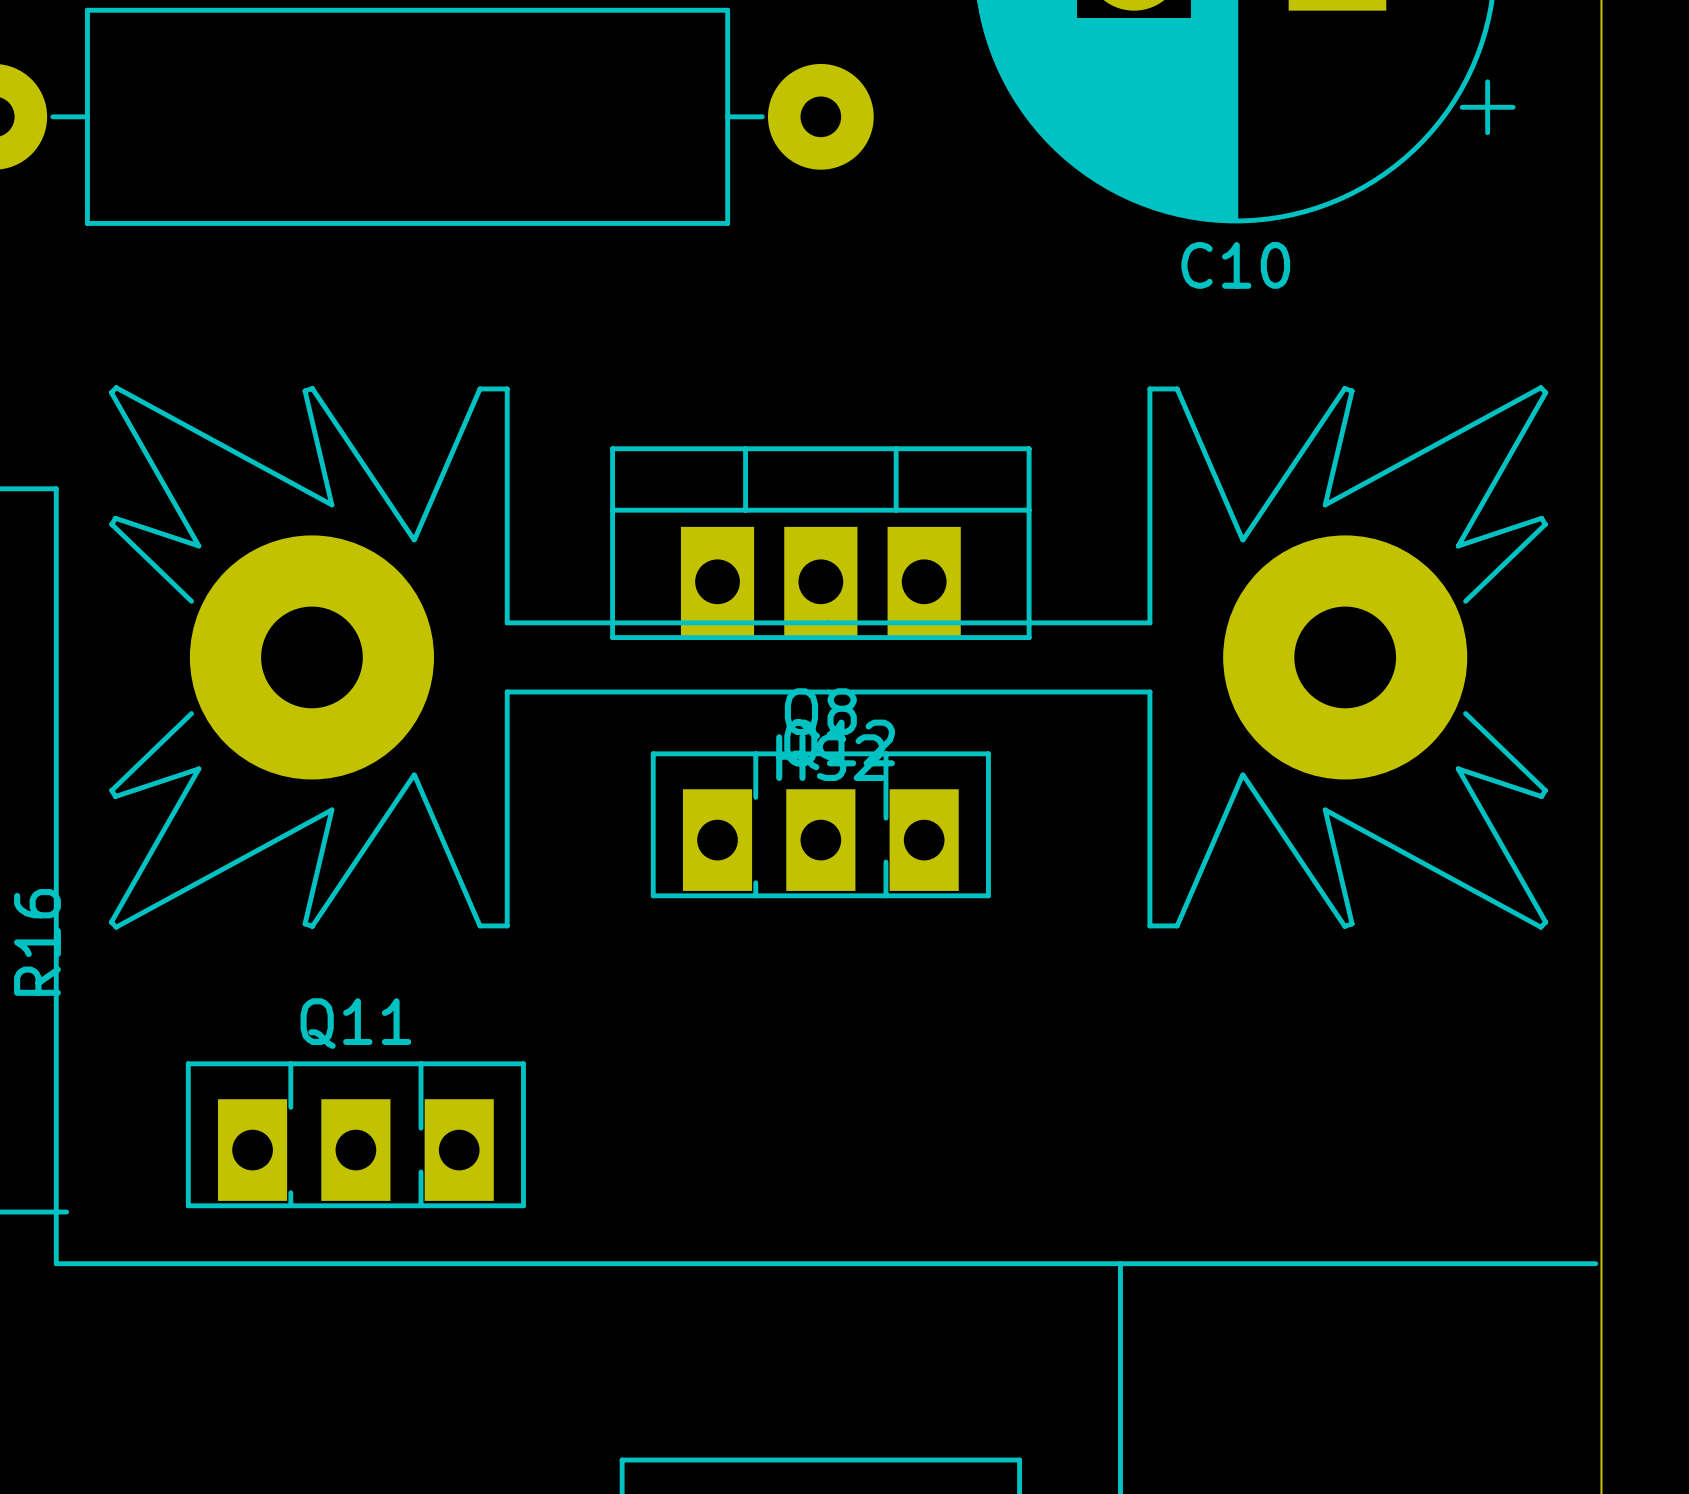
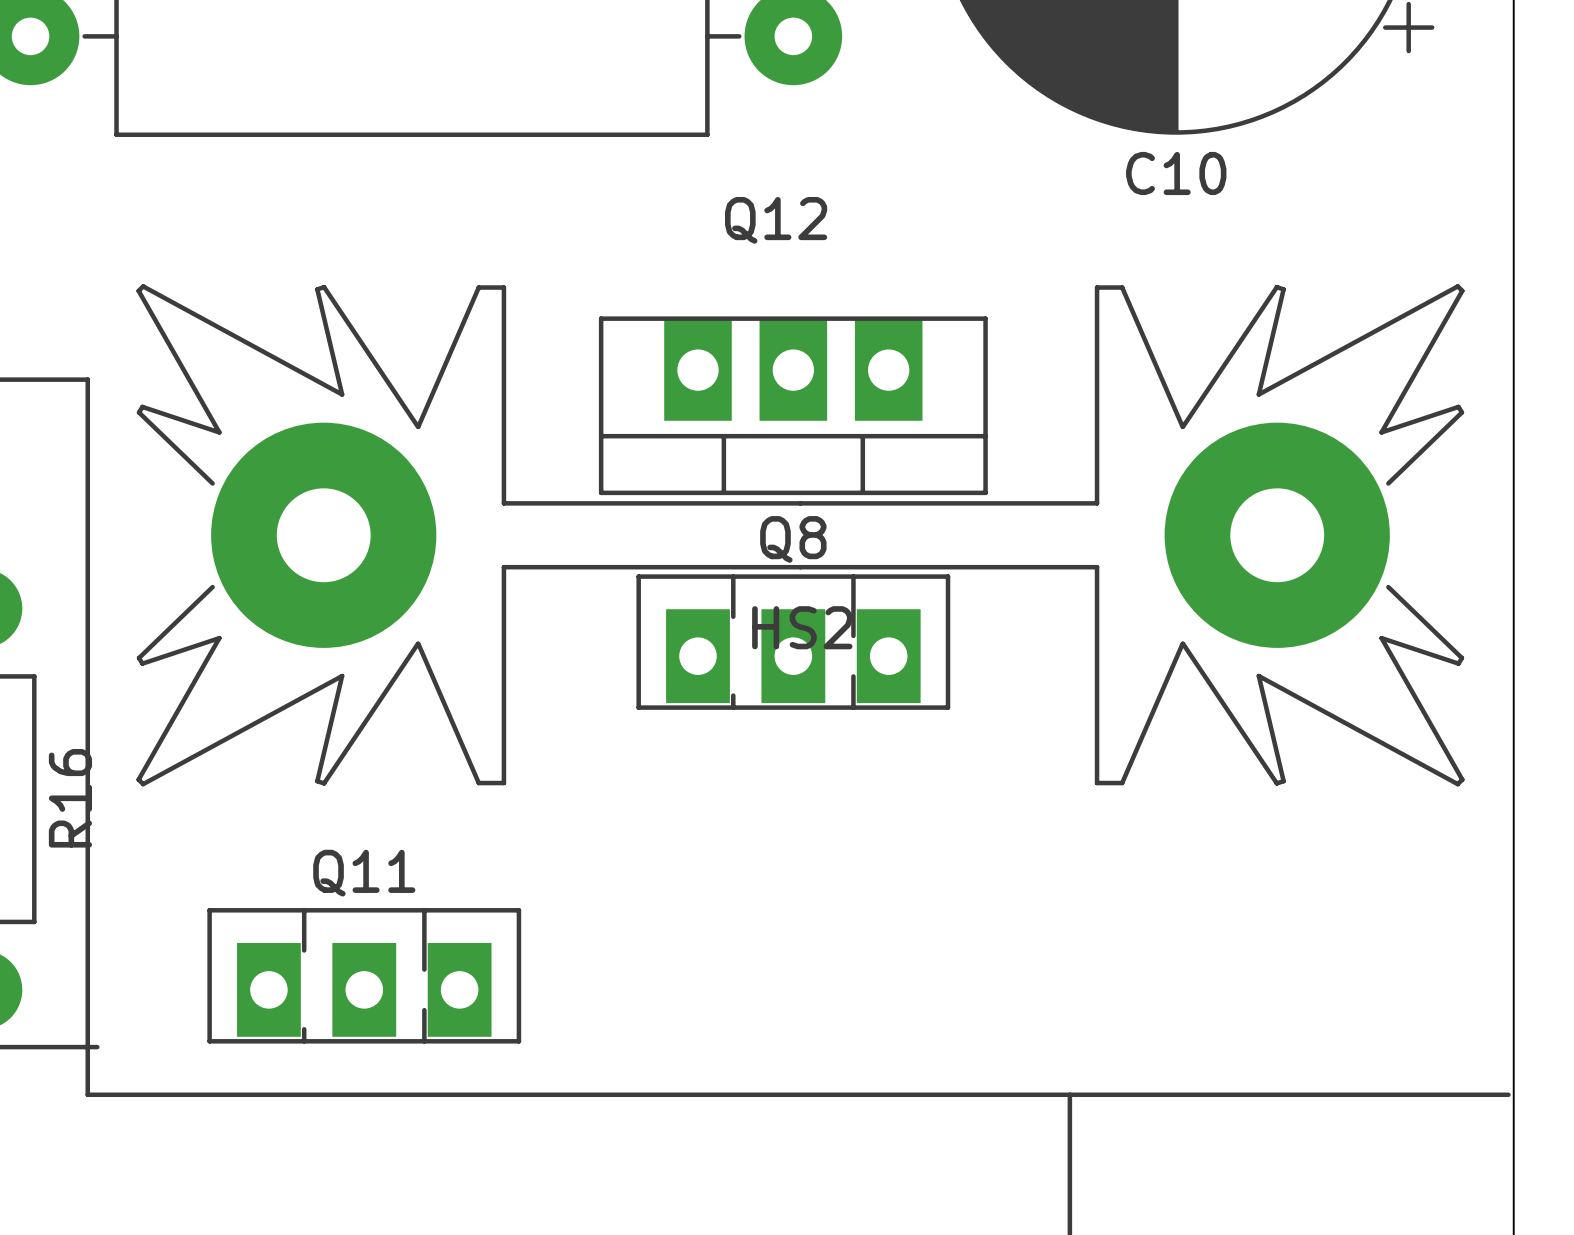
Q12 rotation: 0° (820, 543) -> 180° (793, 405)
Q8 position: (820, 824) -> (793, 642)

